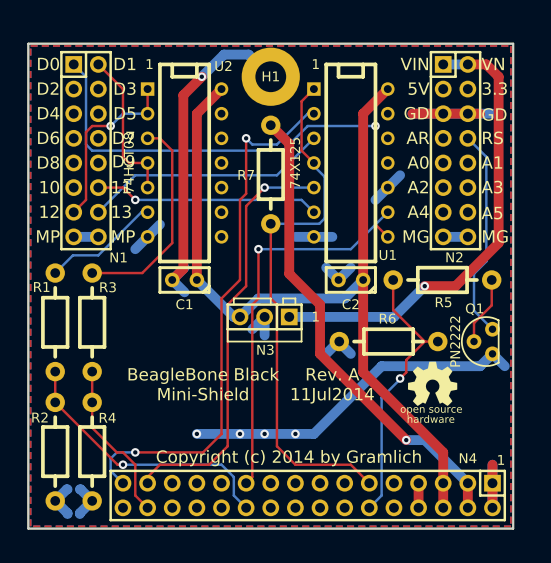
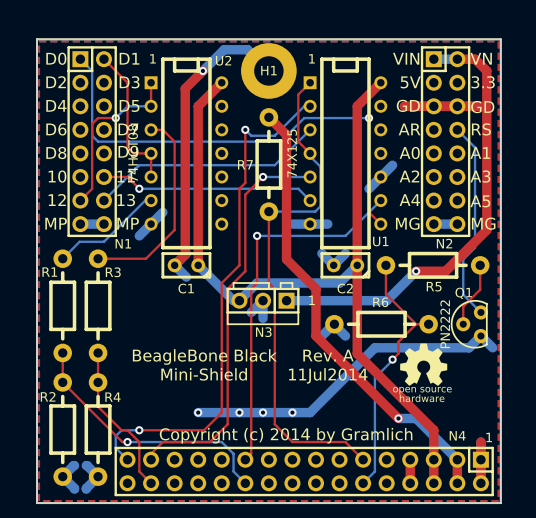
top track: none -> (469, 106) (480, 106)

